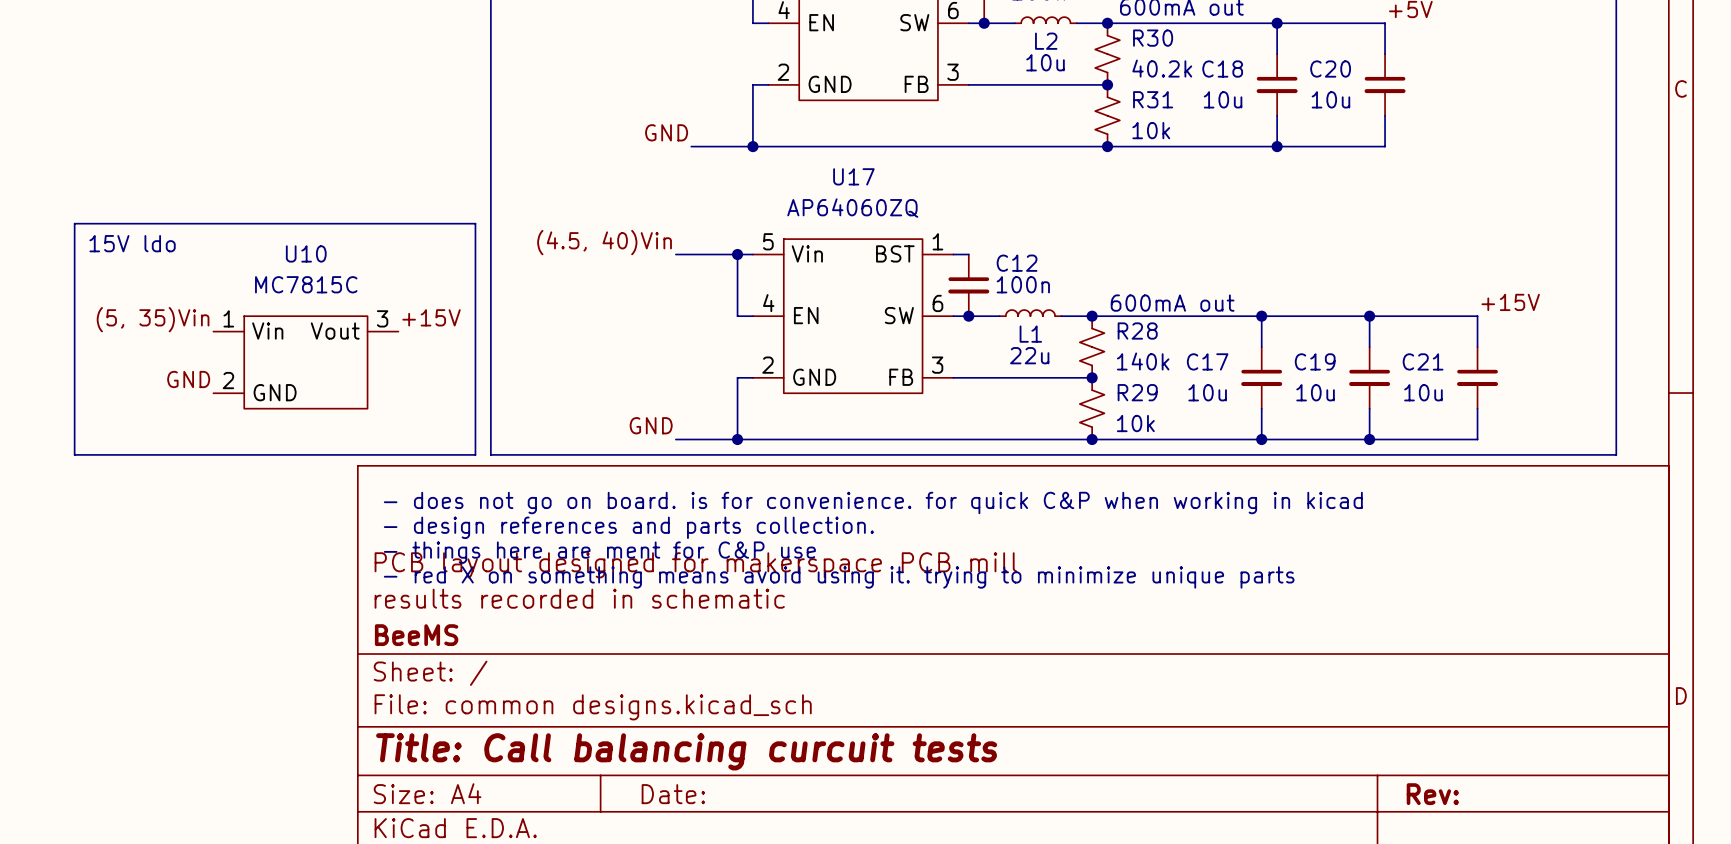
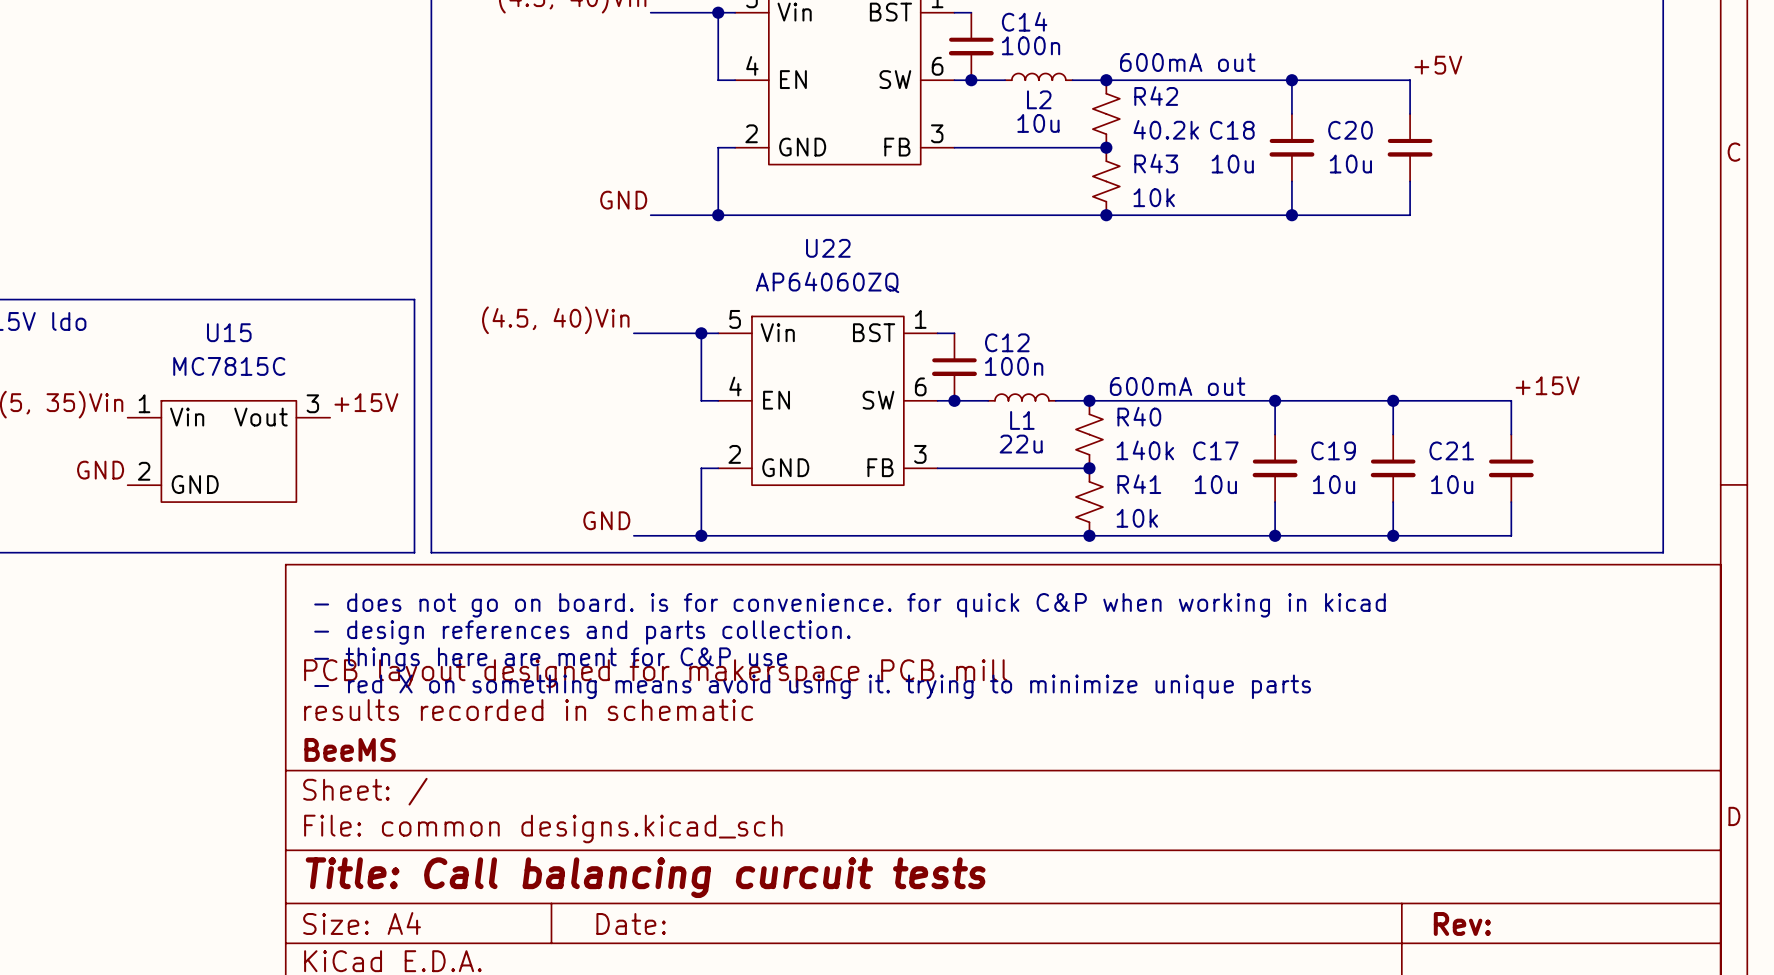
R30 name: R30 (1153, 38) -> R42 (1156, 96)
R31 name: R31 (1153, 99) -> R43 (1156, 163)
U17 name: U17 (853, 176) -> U22 (828, 248)
U10 name: U10 (306, 253) -> U15 (229, 332)
R28 name: R28 (1137, 331) -> R40 (1139, 416)
R29 name: R29 (1137, 392) -> R41 (1139, 484)

